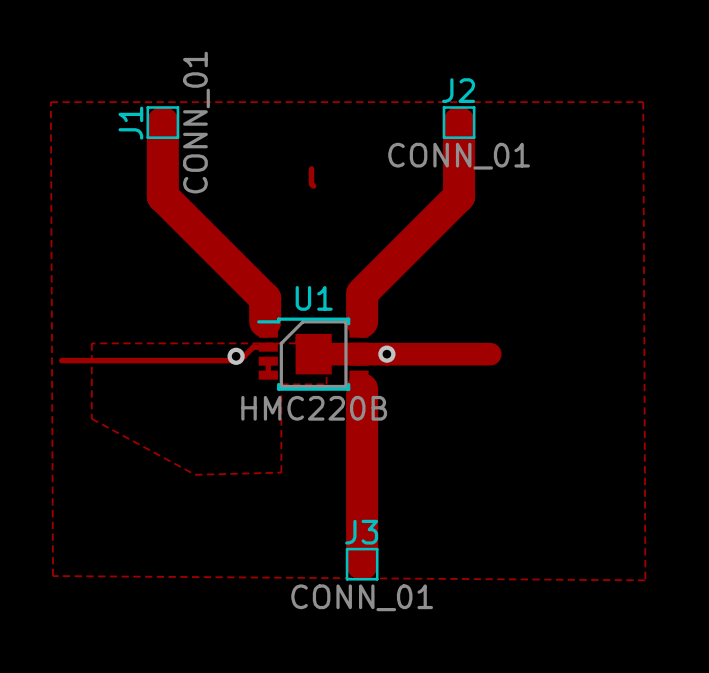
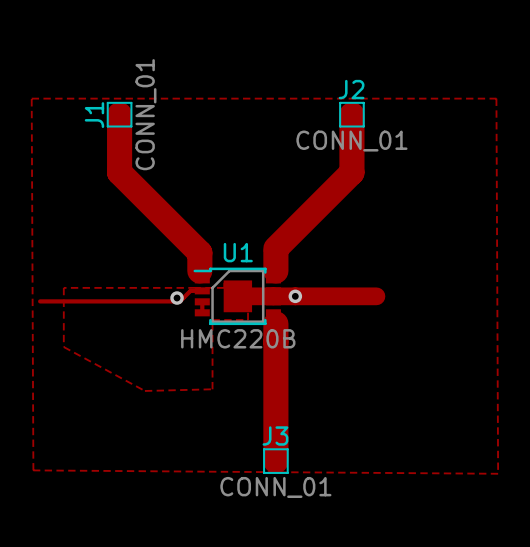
track: (311, 168) (311, 183) (313, 186) -> none

